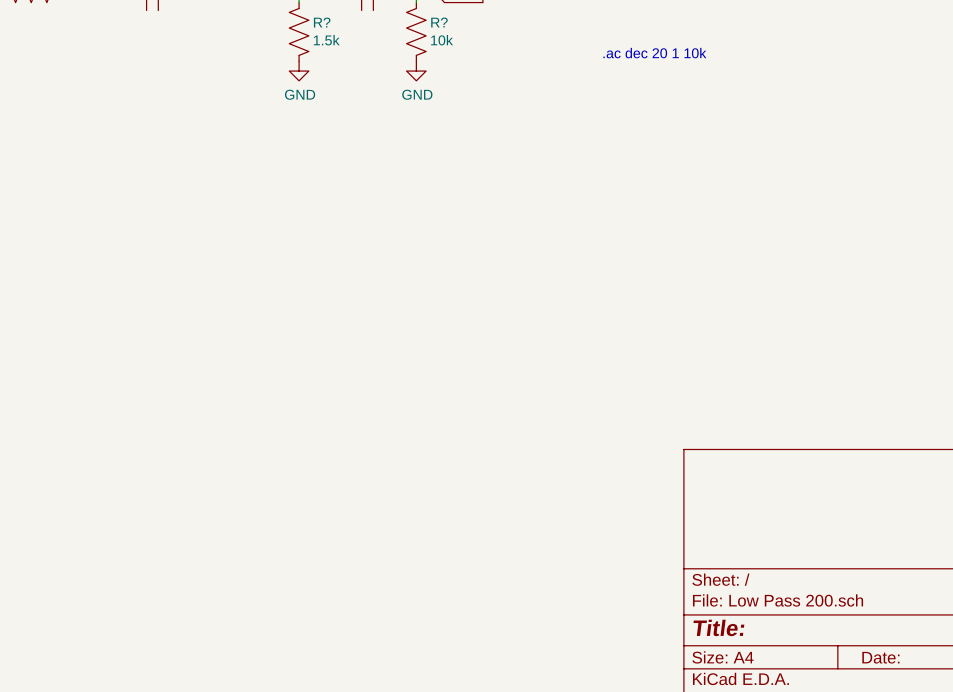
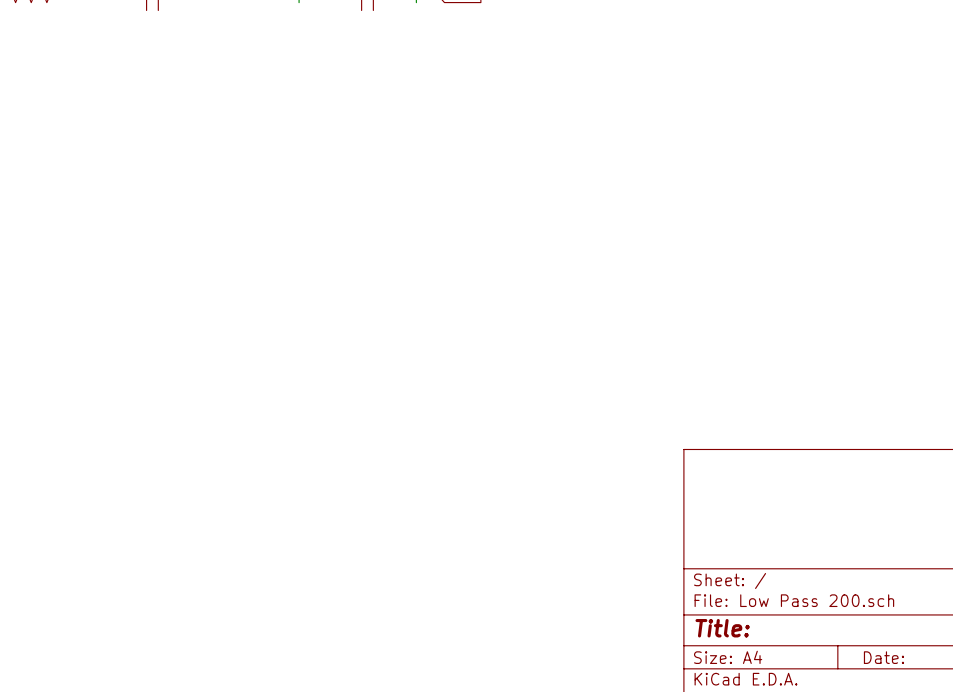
R?: 1.5k (299, 31) -> none
R?: 10k (416, 31) -> none
text: .ac dec 20 1 10k (654, 53) -> none
power symbol: GND (299, 71) -> none
power symbol: GND (416, 71) -> none

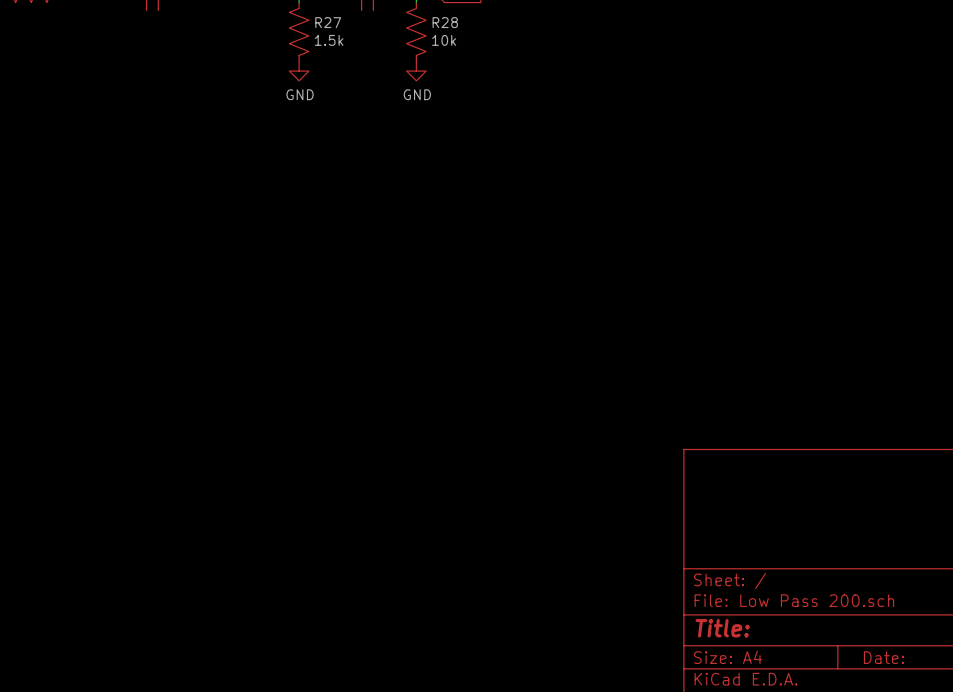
R27: none -> 1.5k (299, 31)
R28: none -> 10k (416, 31)
power symbol: none -> GND (299, 71)
power symbol: none -> GND (416, 71)

